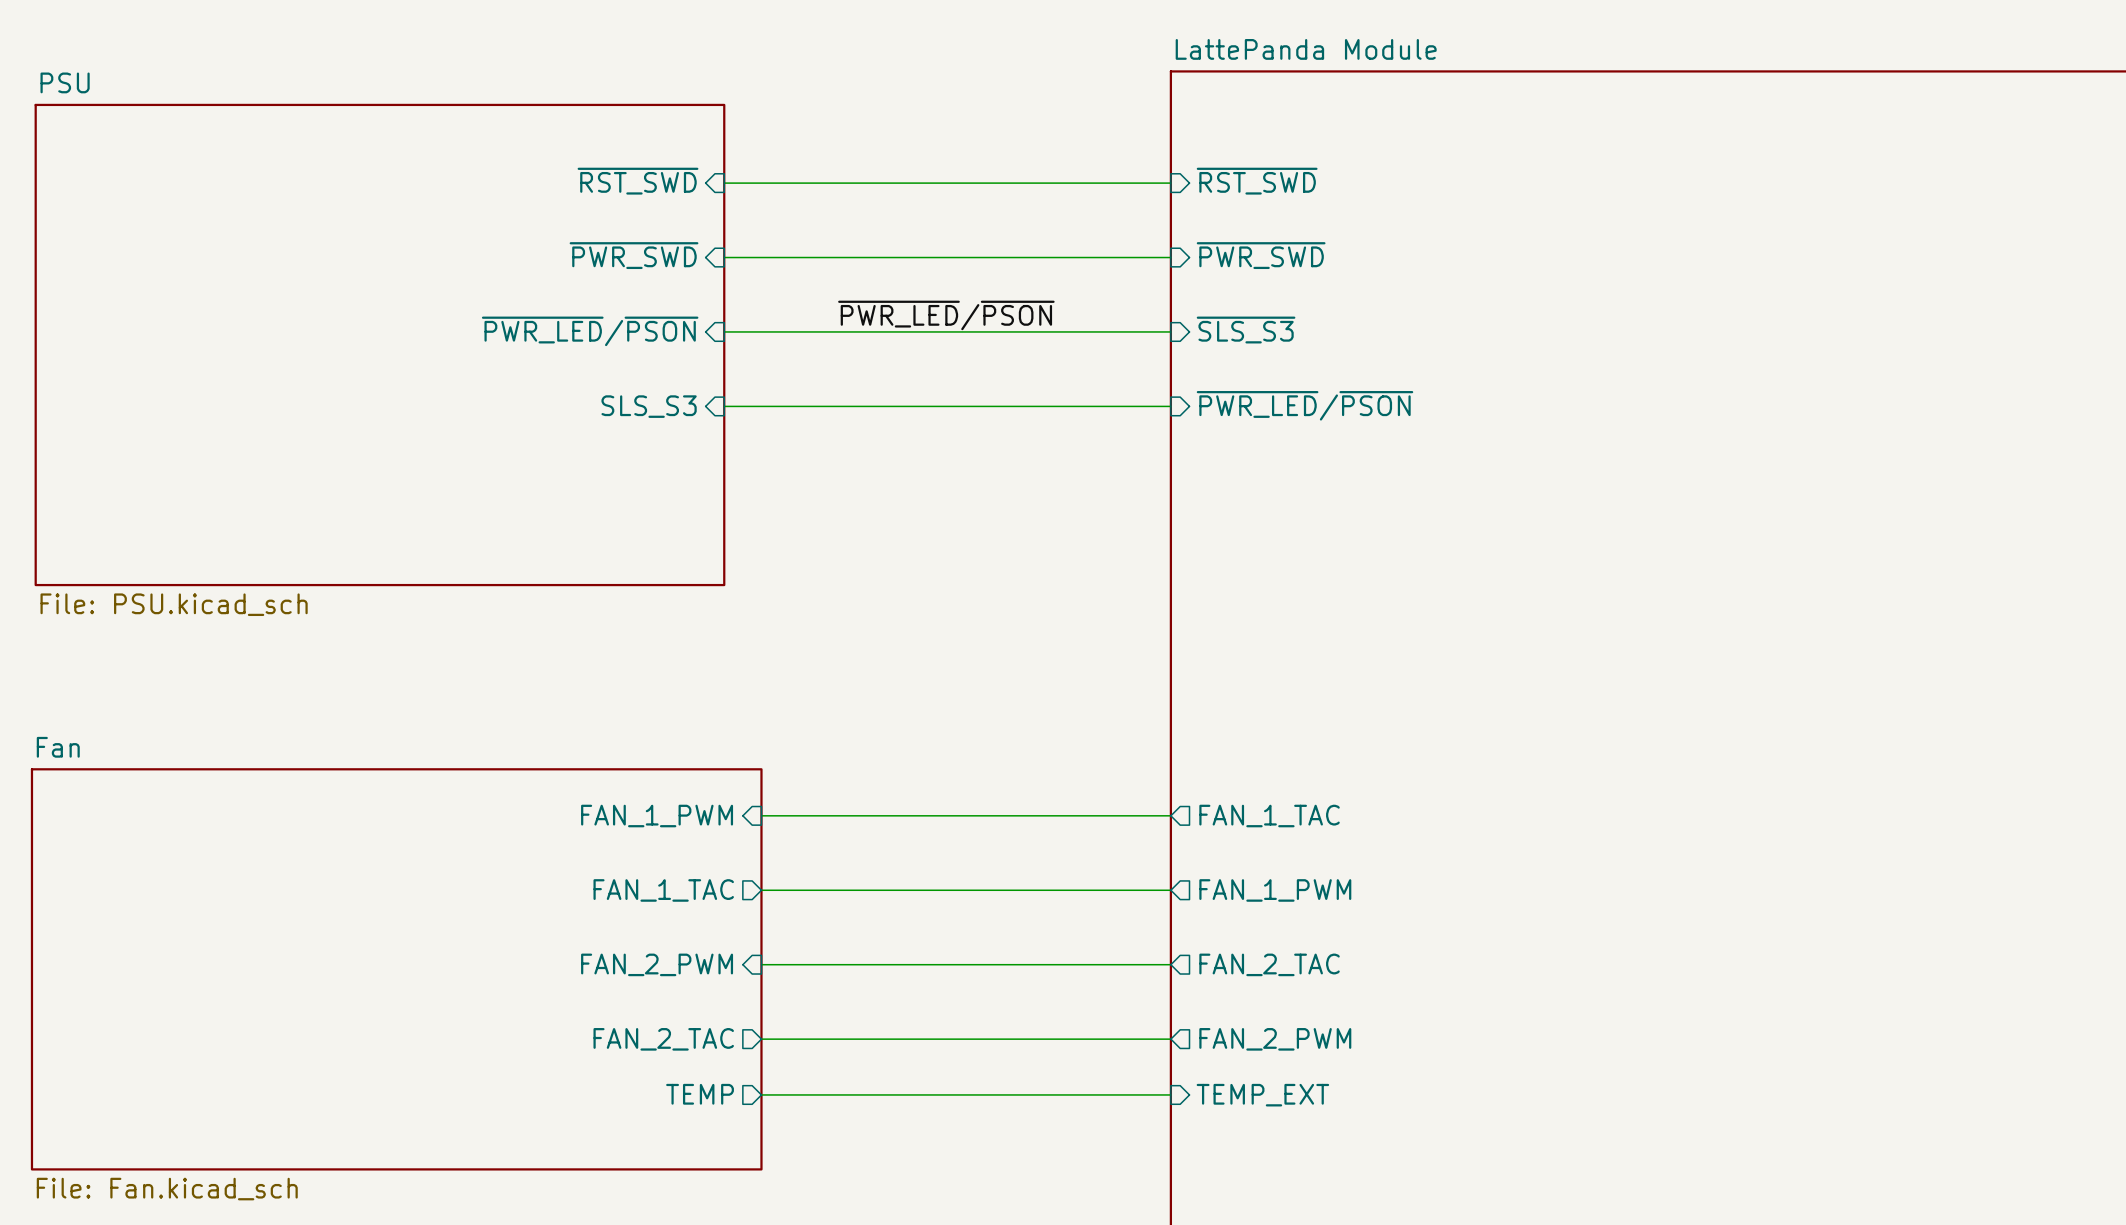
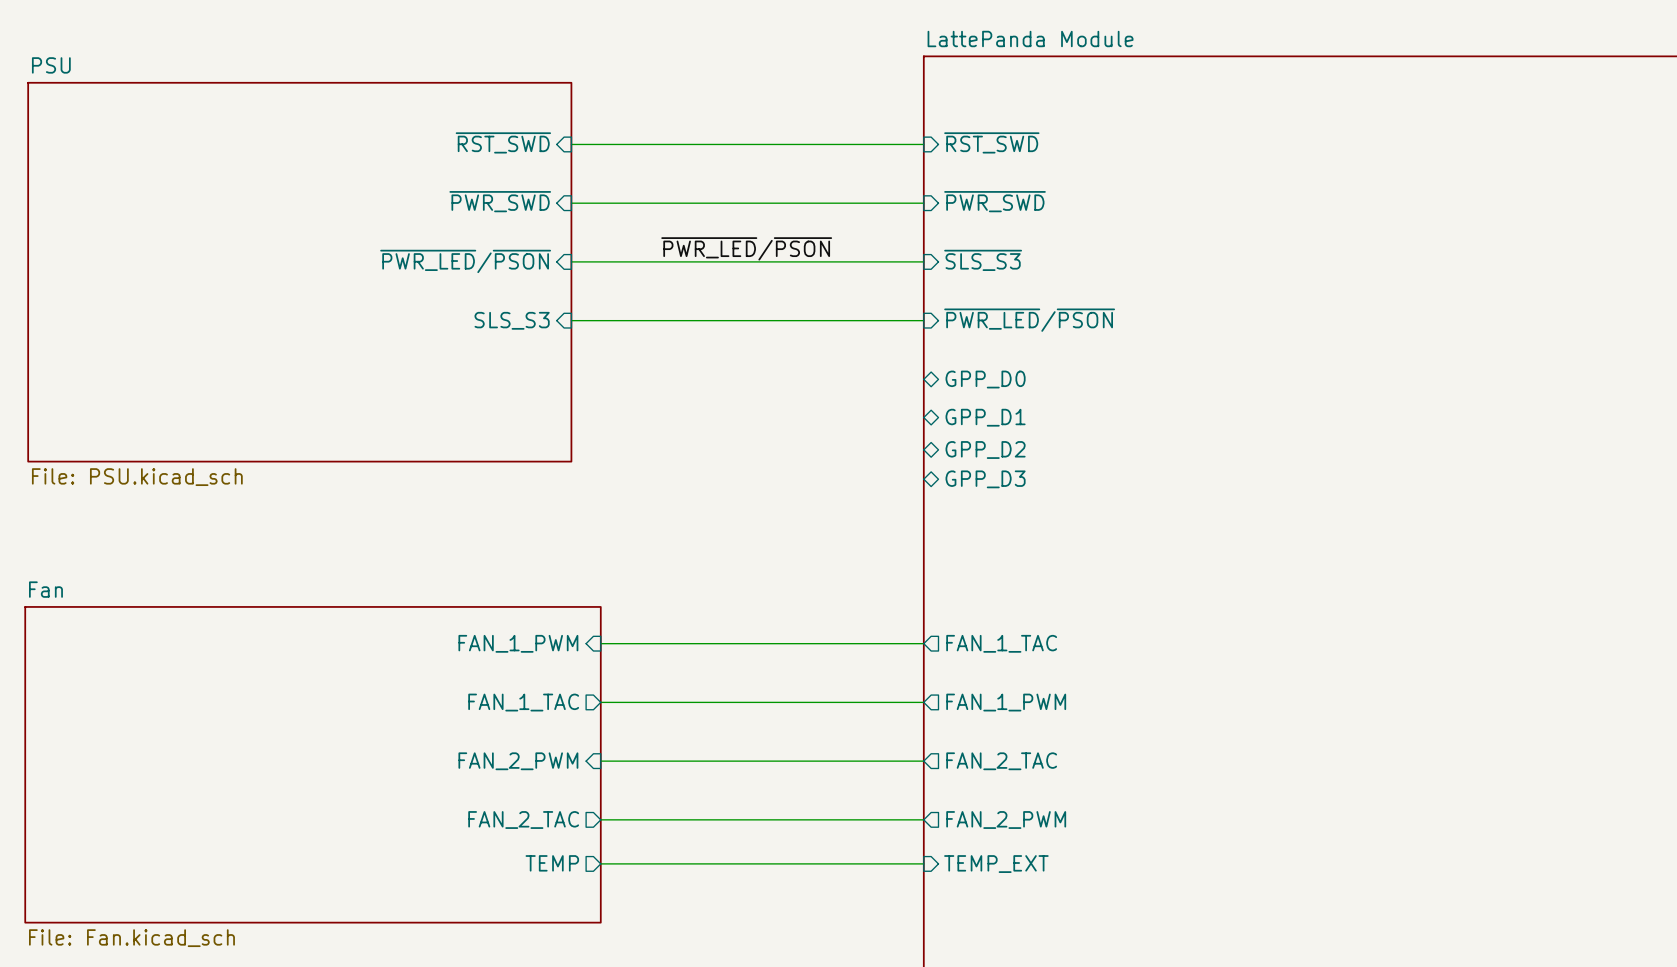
sheet pin: none -> GPP_D0 (985, 379)
sheet pin: none -> GPP_D1 (985, 417)
sheet pin: none -> GPP_D2 (985, 450)
sheet pin: none -> GPP_D3 (985, 479)

